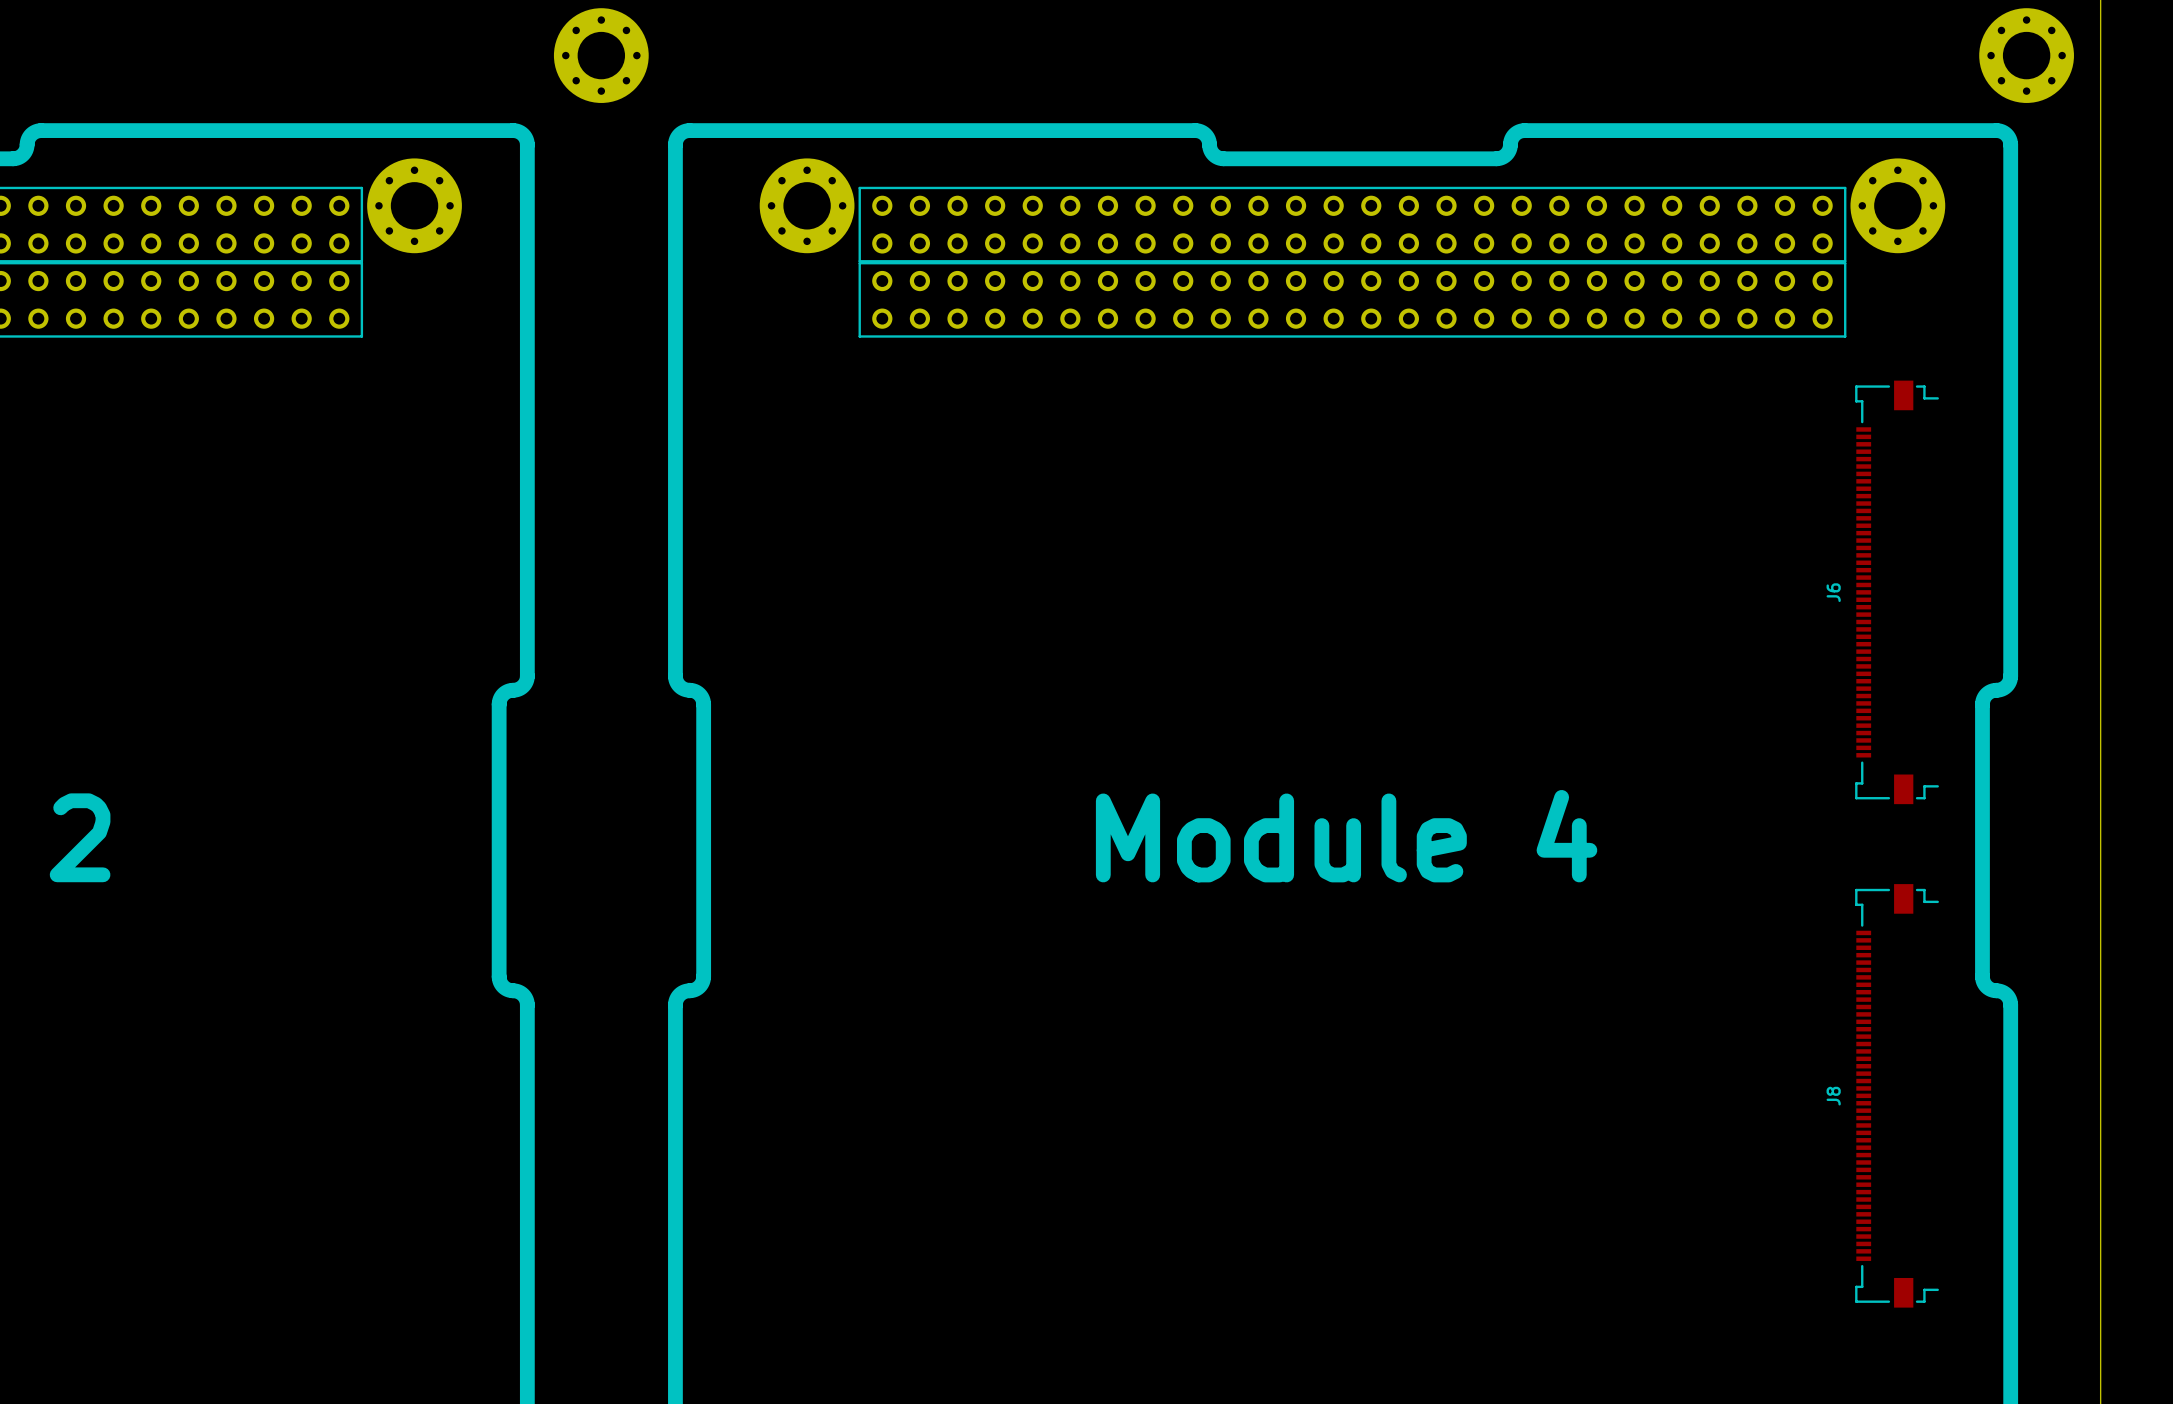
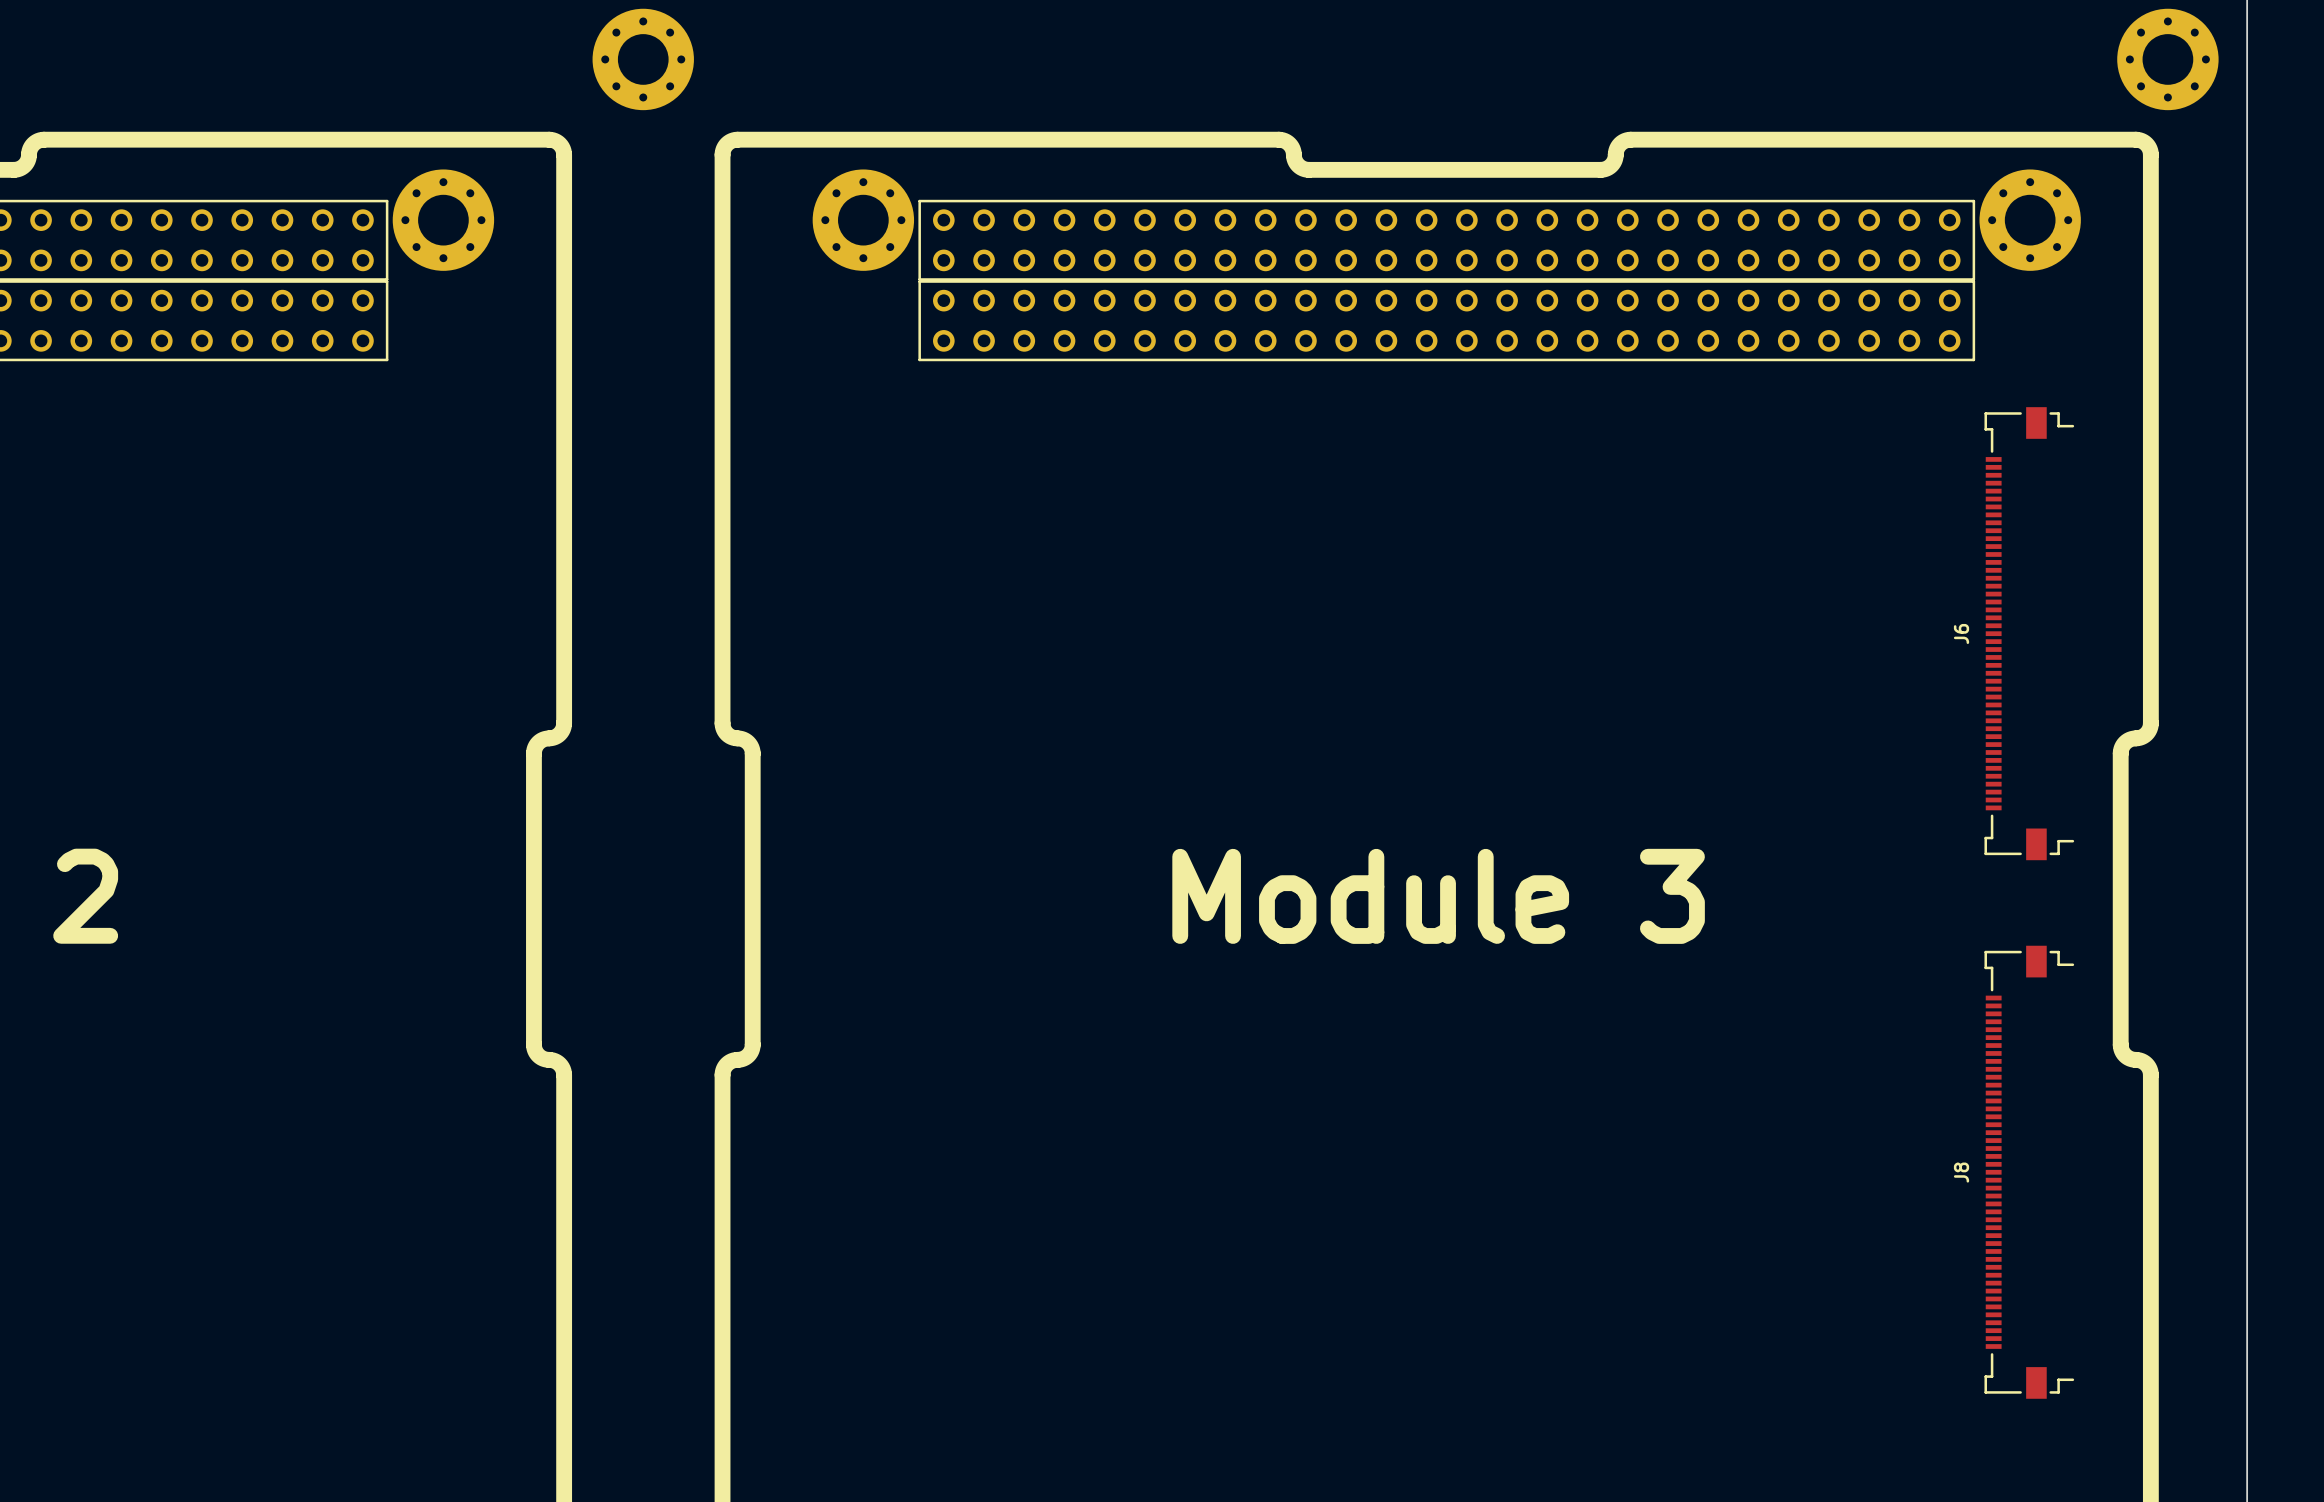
text: Module 4 (1346, 836) -> Module 3 (1438, 896)

